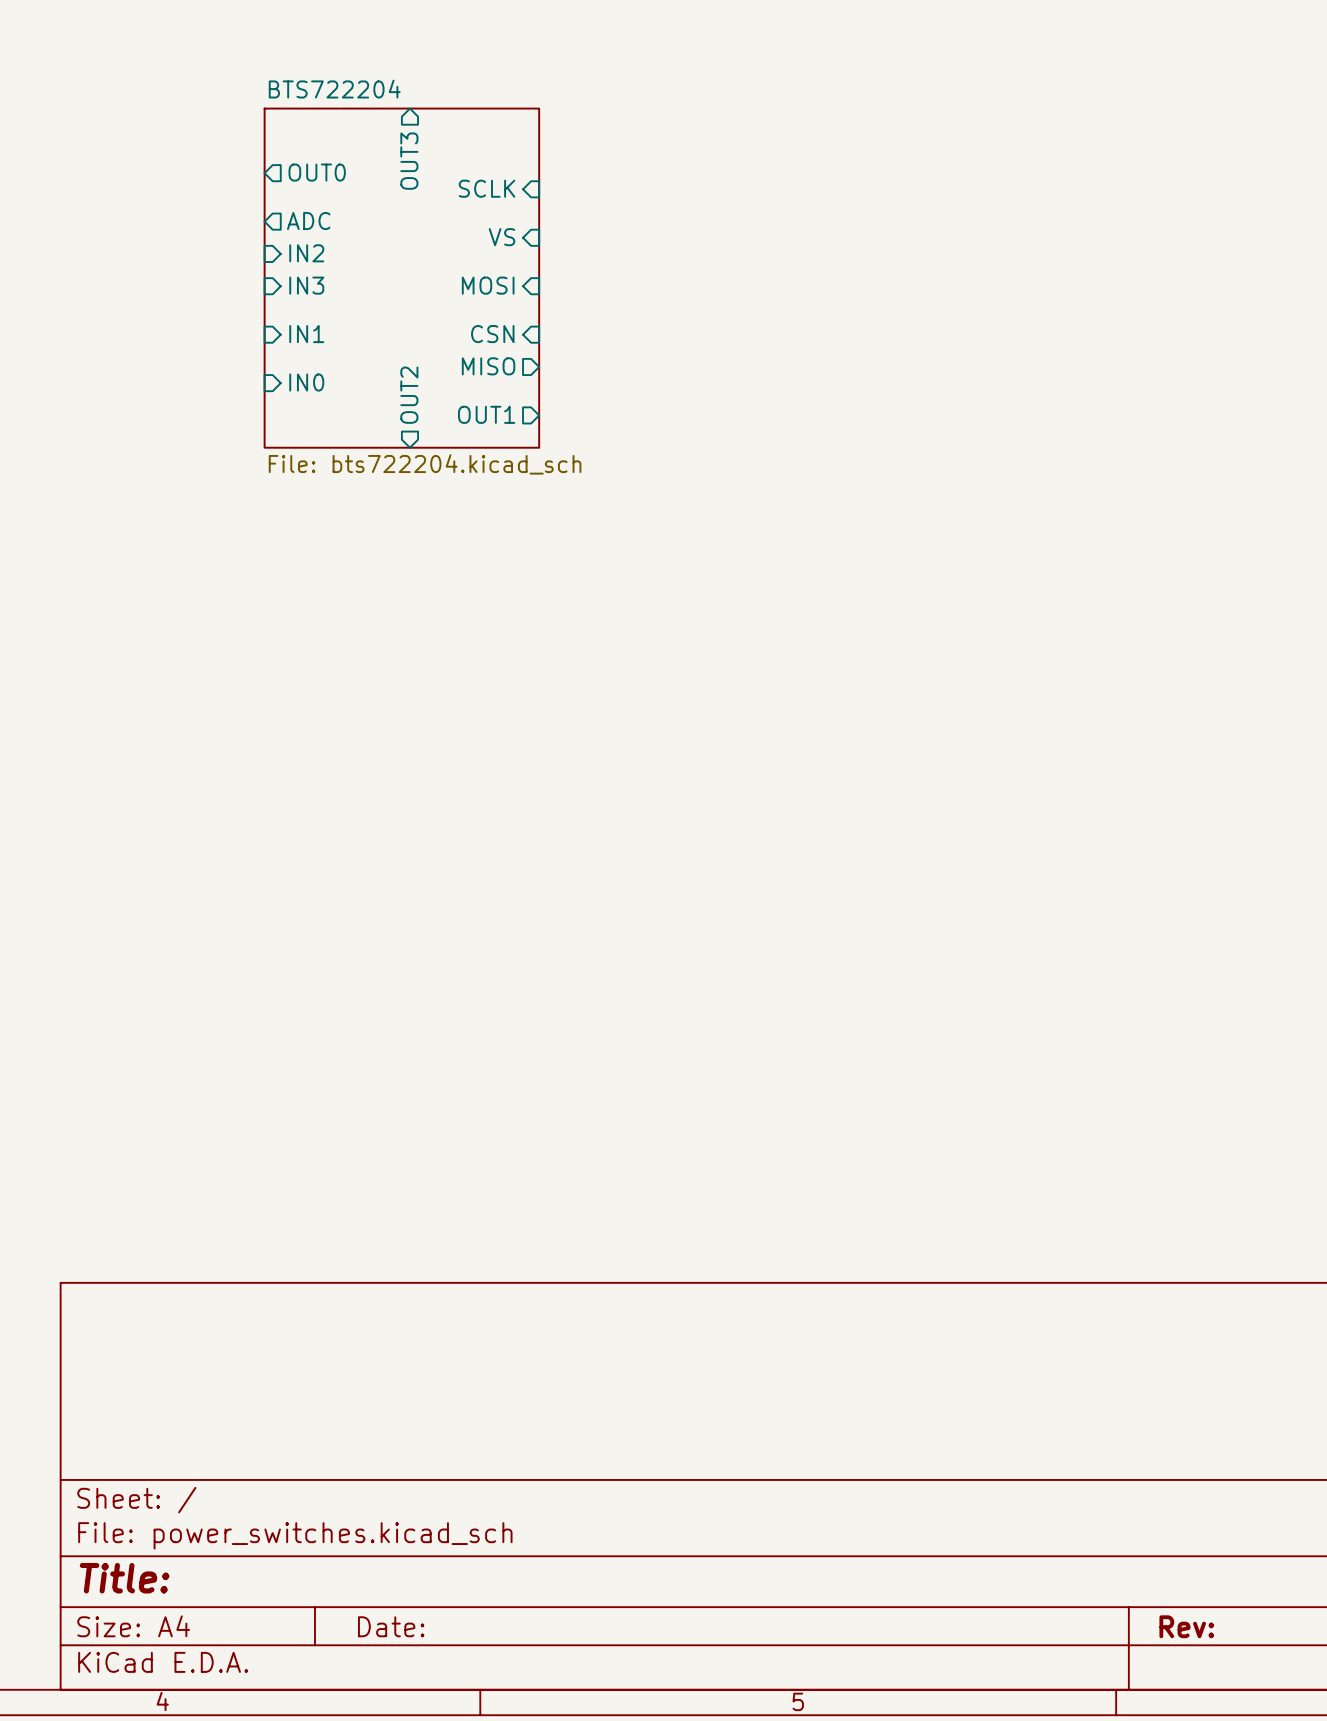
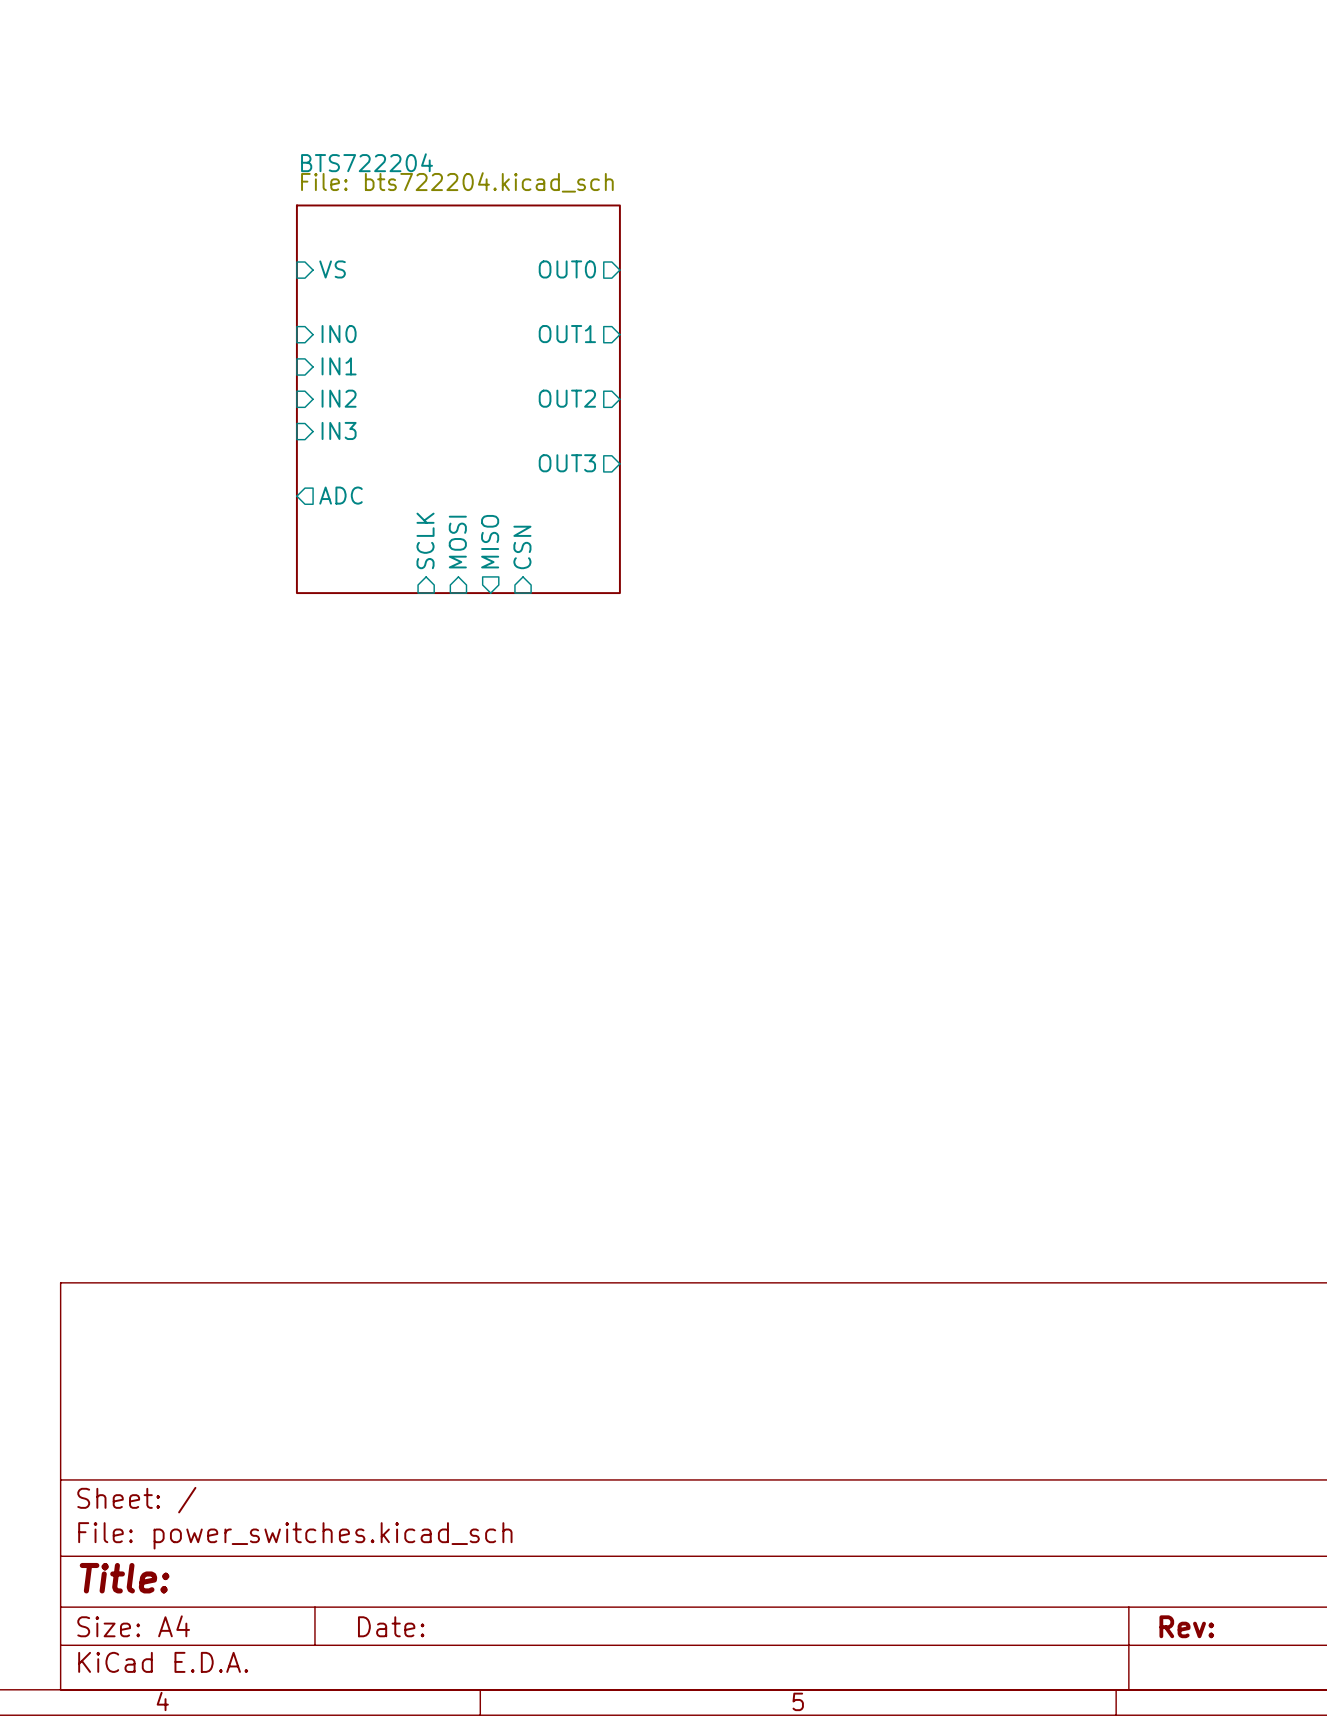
sheet BTS722204 name position: BTS722204 (334, 89) -> BTS722204 (367, 162)
sheet BTS722204 shape: [263, 107, 541, 449] -> [295, 204, 621, 595]
sheet pin: OUT3 (409, 161) -> none
sheet pin: OUT0 (317, 172) -> none
sheet pin: SCLK (487, 188) -> none
sheet pin position: ADC (308, 221) -> ADC (341, 495)
sheet pin rotation: 0° (502, 237) -> 180° (332, 269)
sheet pin position: VS (502, 237) -> VS (332, 269)
sheet pin position: IN2 (306, 253) -> IN2 (339, 398)
sheet pin: none -> OUT0 (567, 269)
sheet pin position: IN3 (306, 285) -> IN3 (339, 430)
sheet pin rotation: 0° (488, 285) -> 90° clockwise (457, 542)
sheet pin position: MOSI (488, 285) -> MOSI (457, 542)
sheet pin position: IN1 (306, 334) -> IN1 (339, 366)
sheet pin rotation: 0° (492, 334) -> 90° clockwise (522, 547)
sheet pin position: CSN (492, 334) -> CSN (522, 547)
sheet pin rotation: 0° (488, 366) -> 90° clockwise (490, 541)
sheet pin position: MISO (488, 366) -> MISO (490, 541)
sheet pin position: IN0 (306, 382) -> IN0 (339, 334)
sheet pin rotation: 0° (409, 395) -> 90° counterclockwise (567, 398)
sheet pin position: OUT2 (409, 395) -> OUT2 (567, 398)
sheet pin position: OUT1 (486, 414) -> OUT1 (567, 334)
sheet pin: none -> OUT3 (567, 463)
sheet BTS722204 value position: File: bts722204.kicad_sch (425, 464) -> File: bts722204.kicad_sch (457, 182)
sheet pin: none -> SCLK (425, 540)

